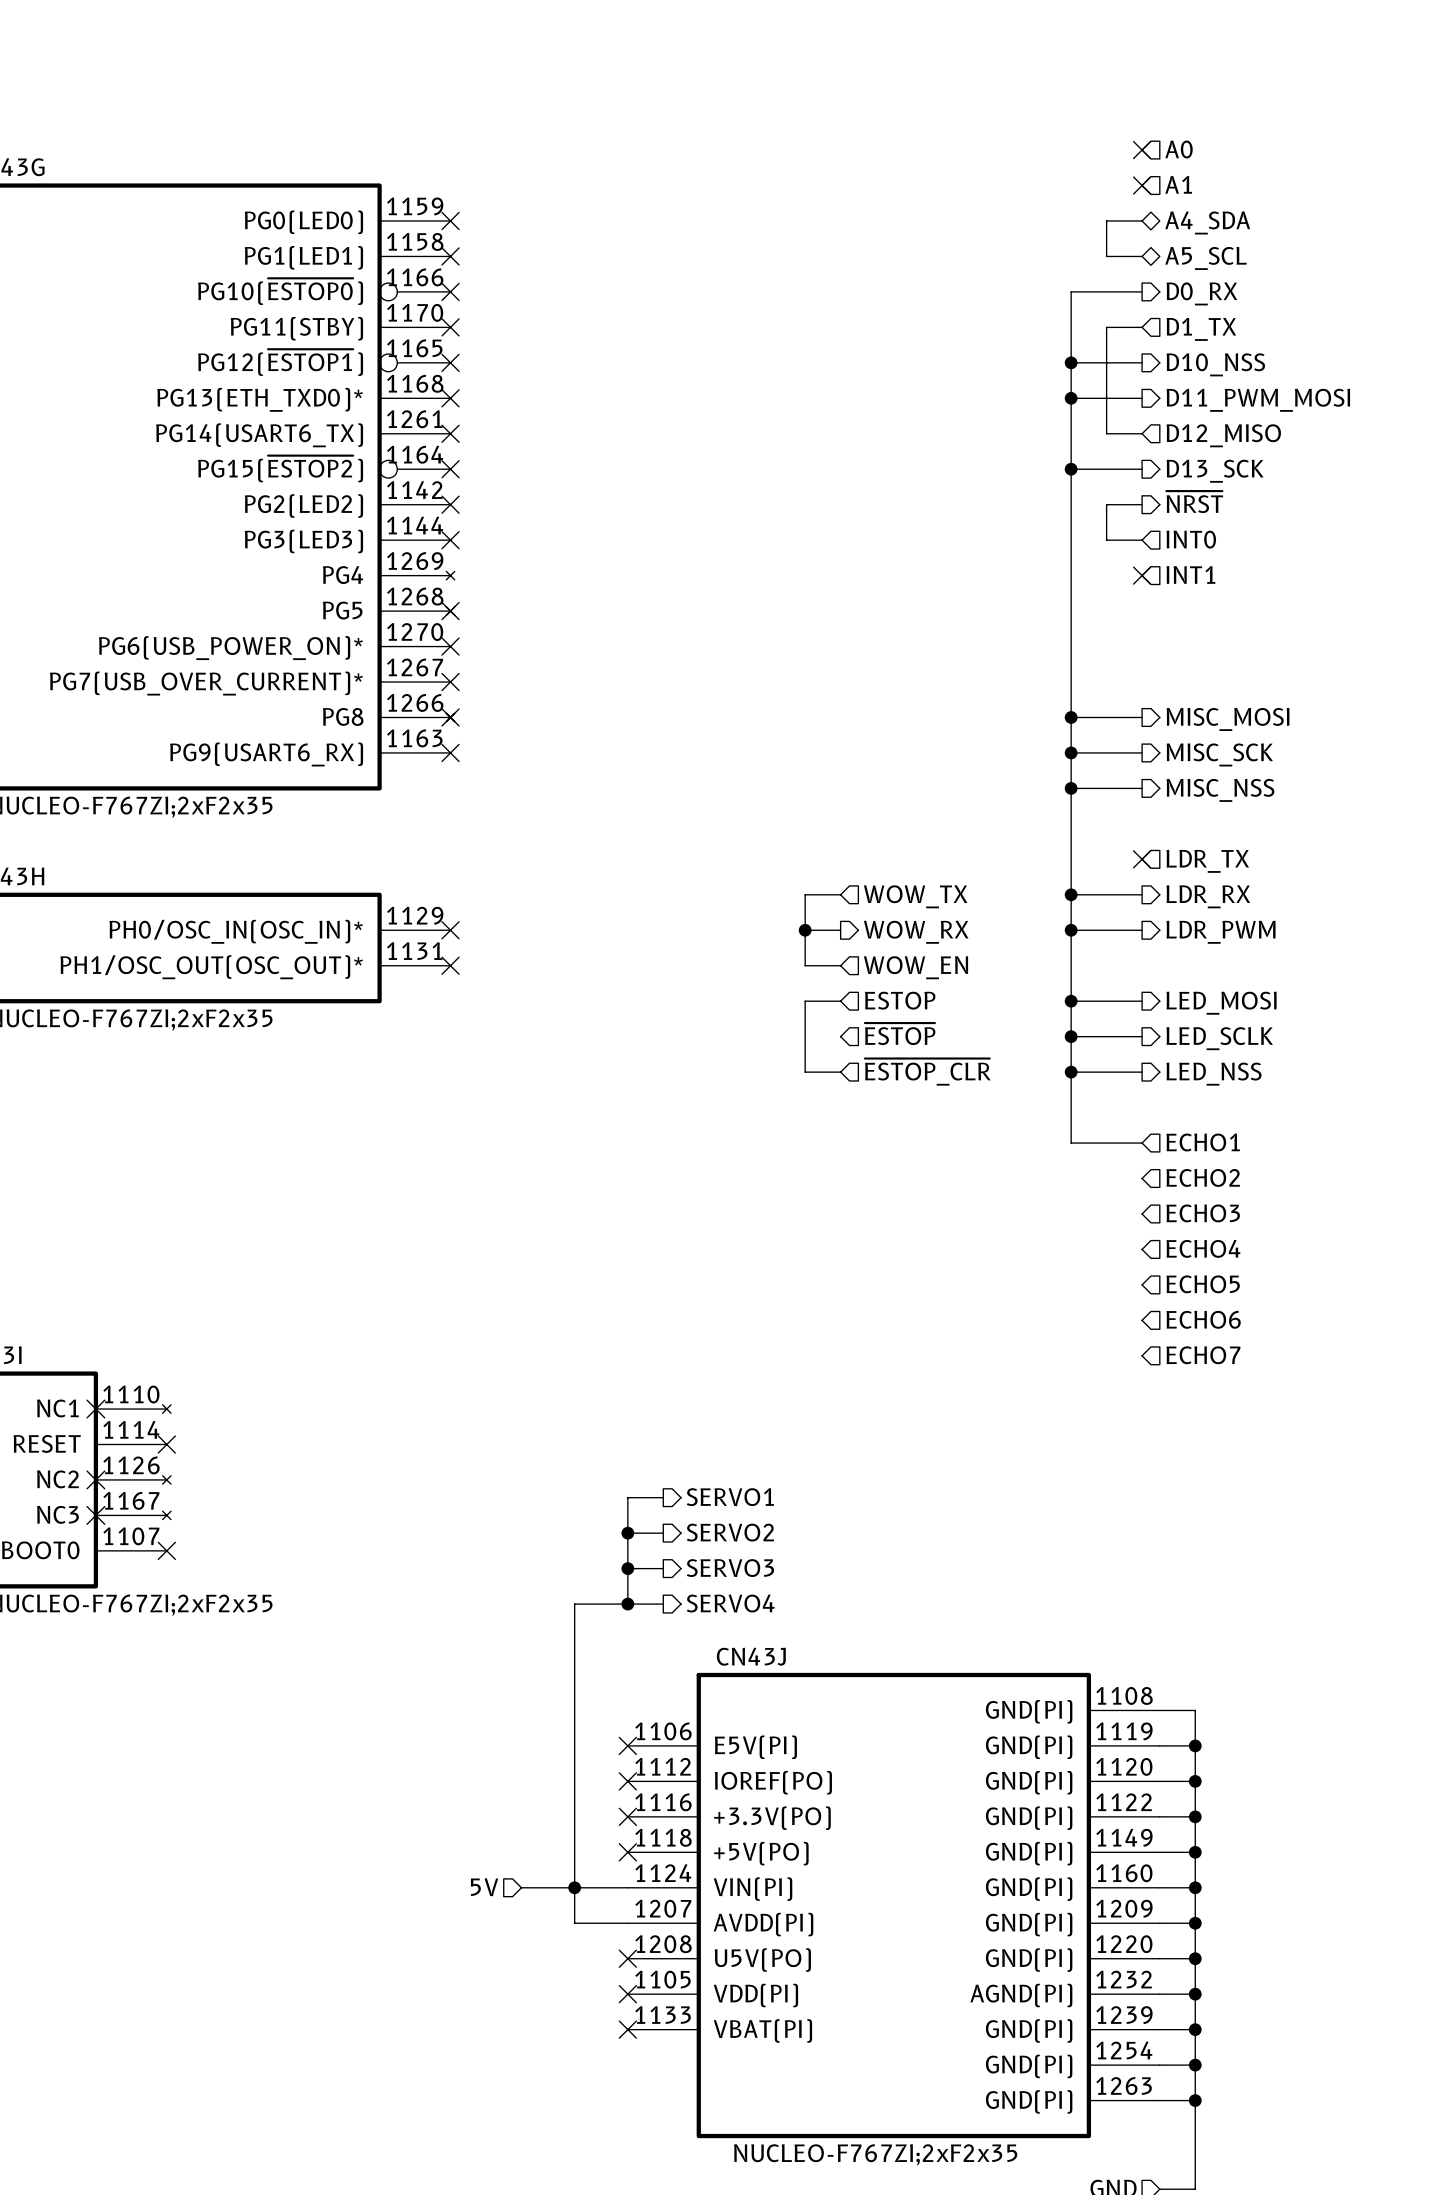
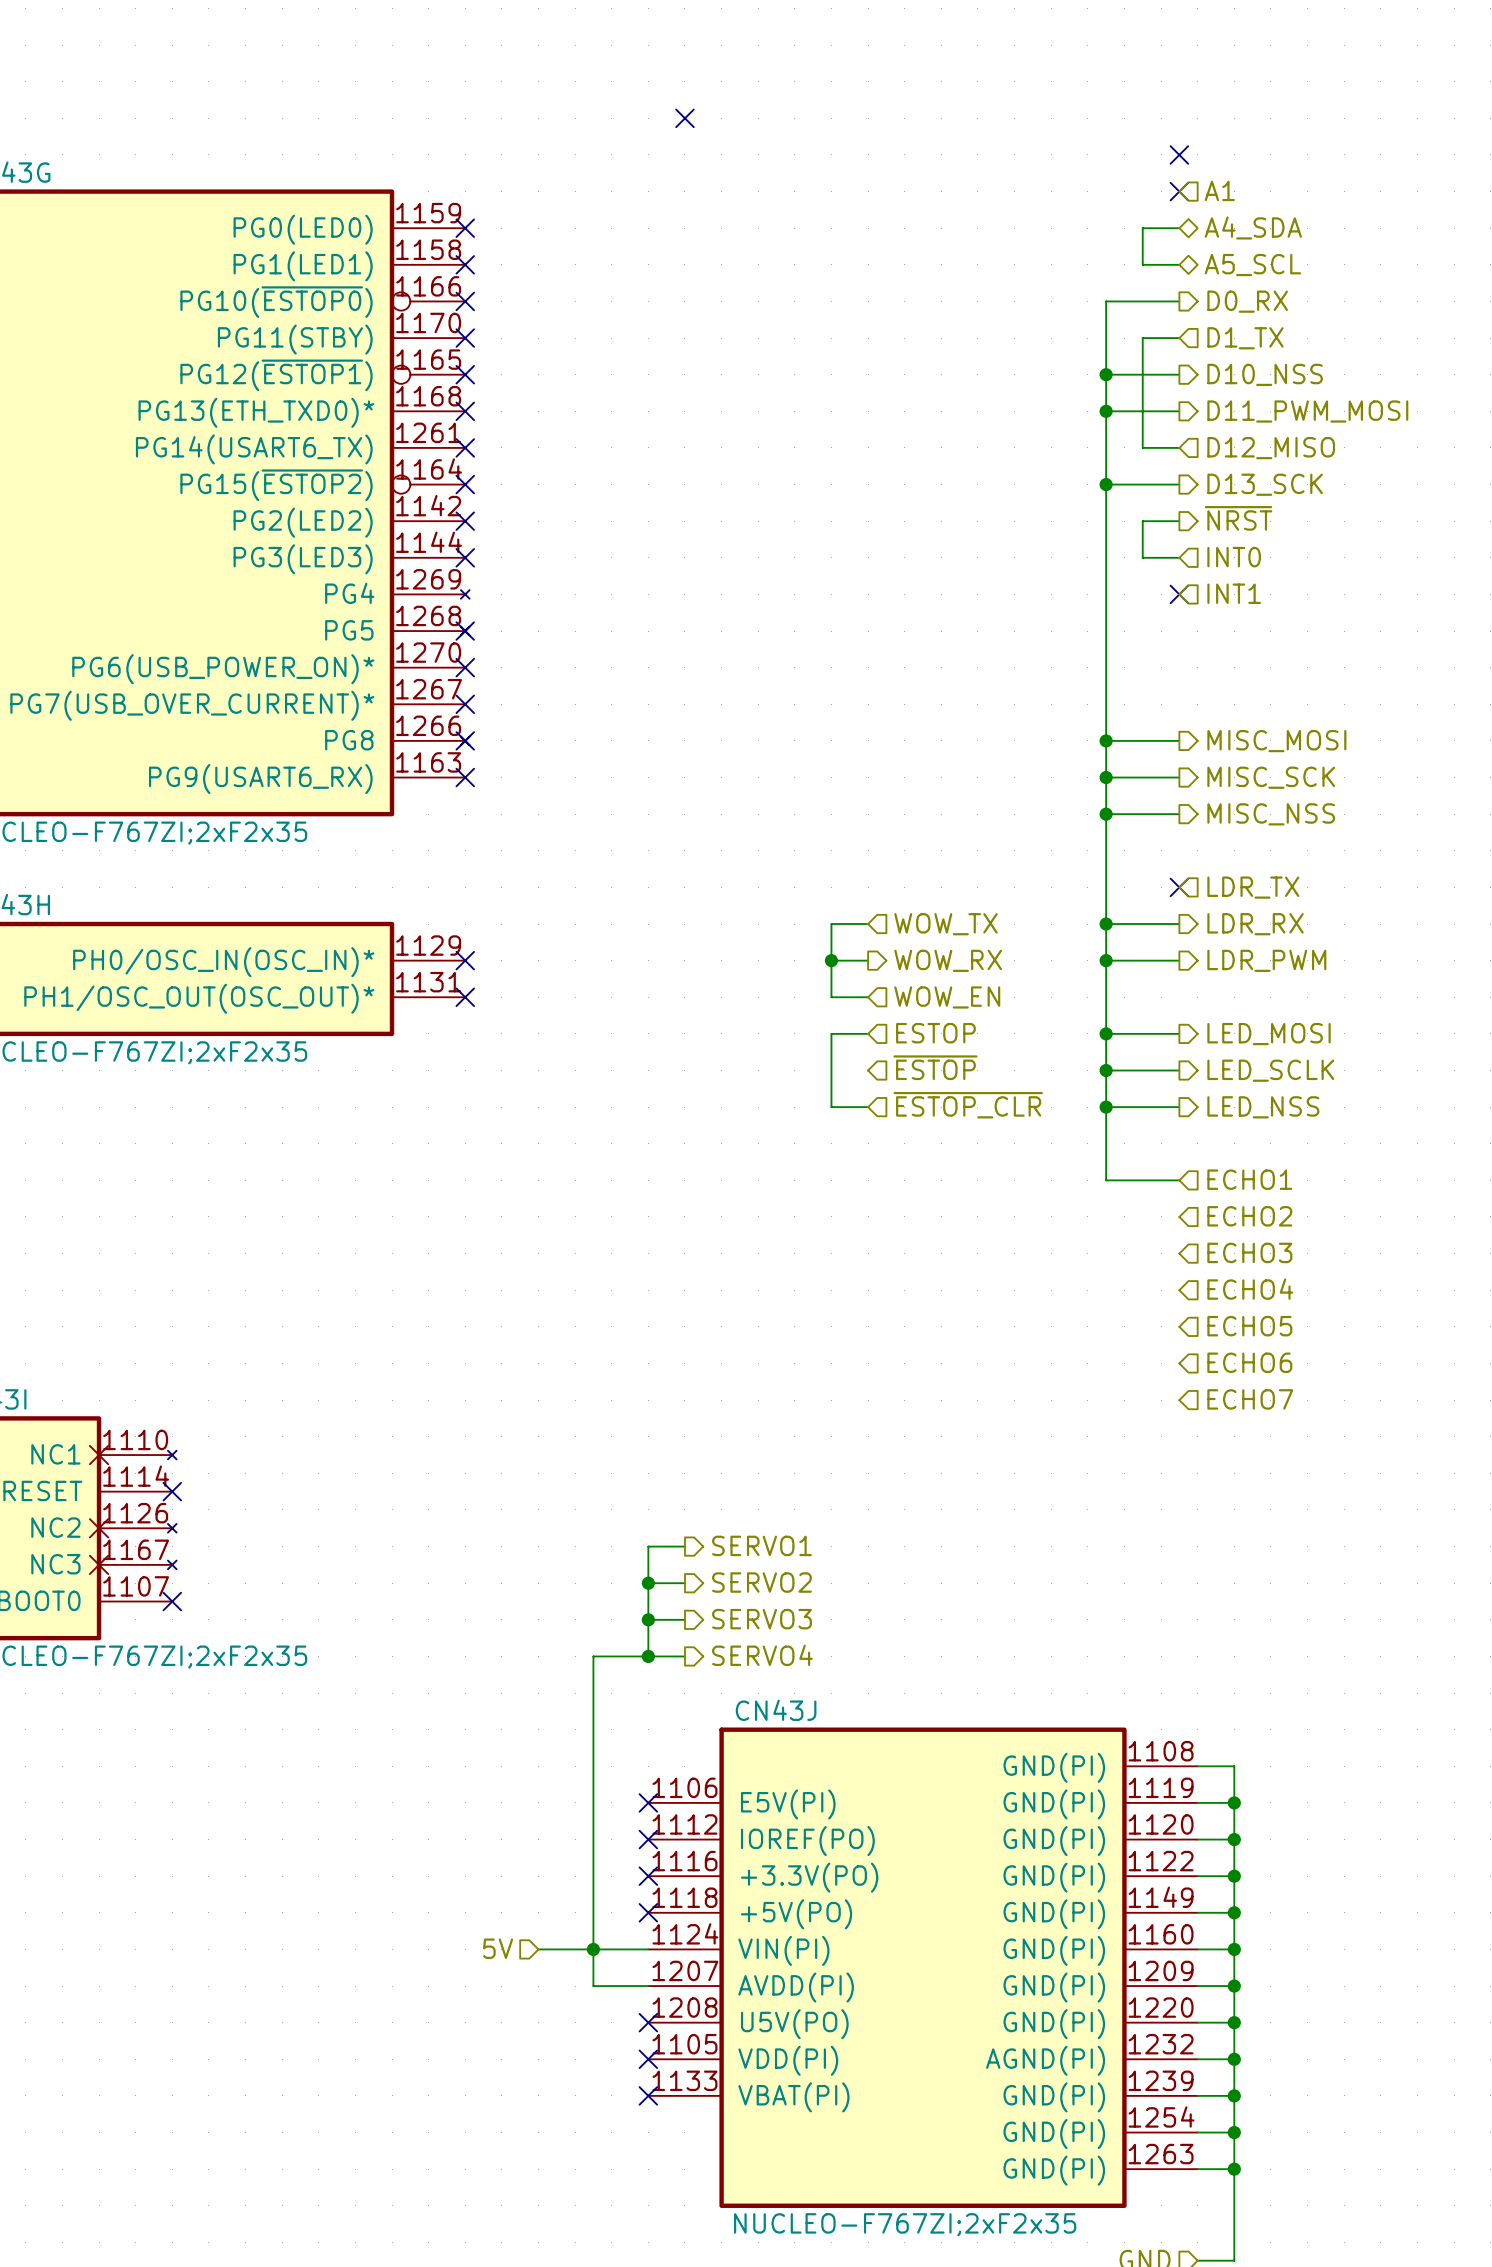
no-connect mark: none -> (684, 118)
hierarchical label: A0 (1179, 149) -> none

